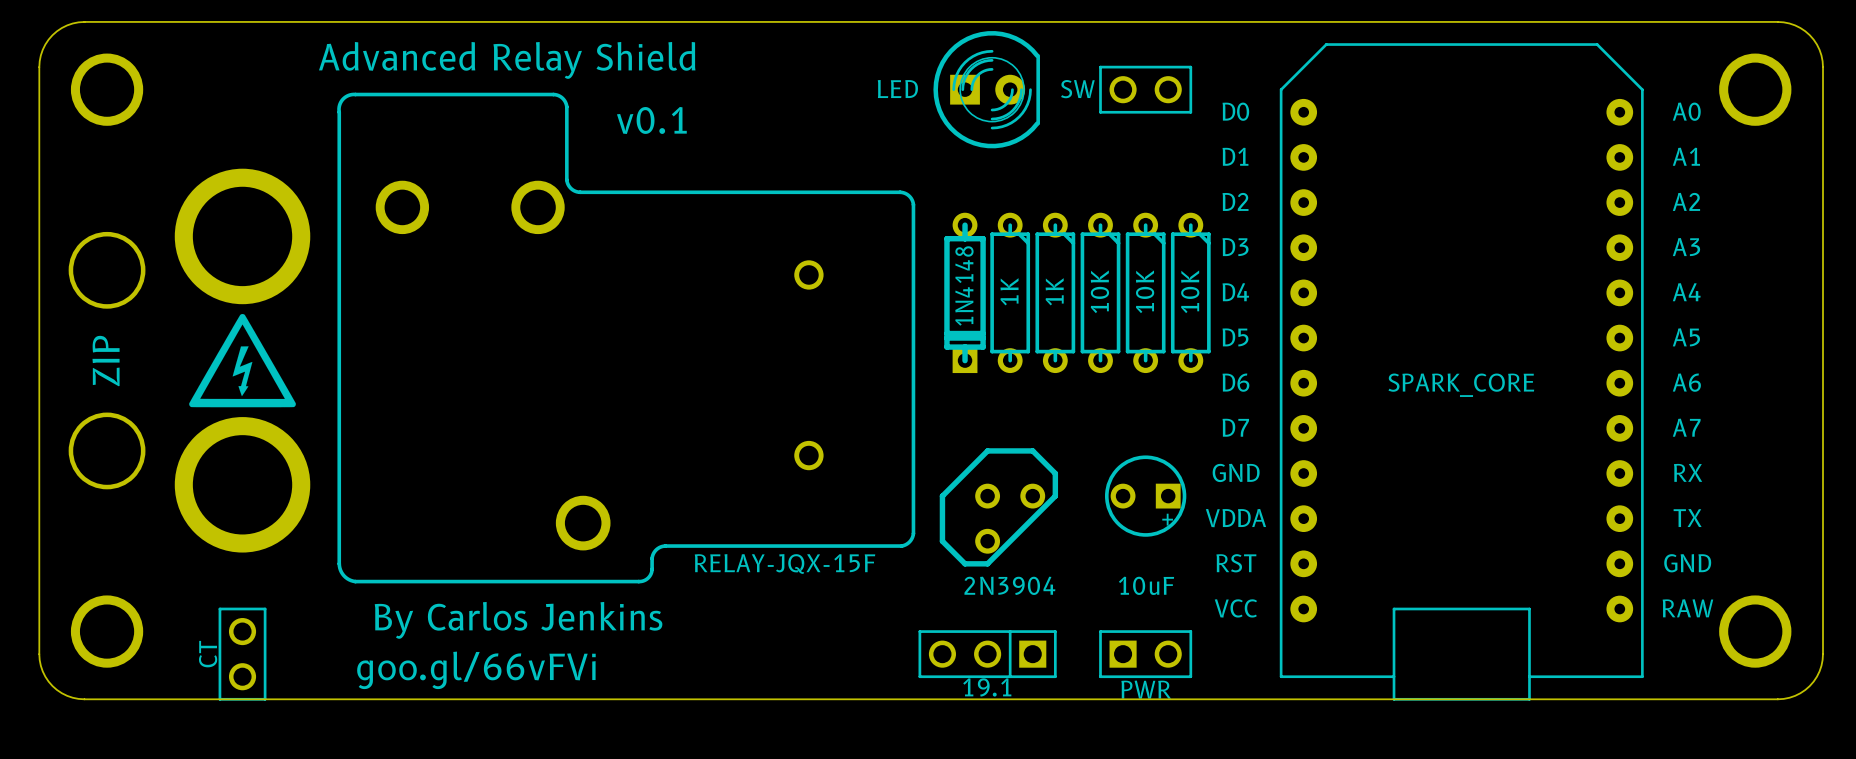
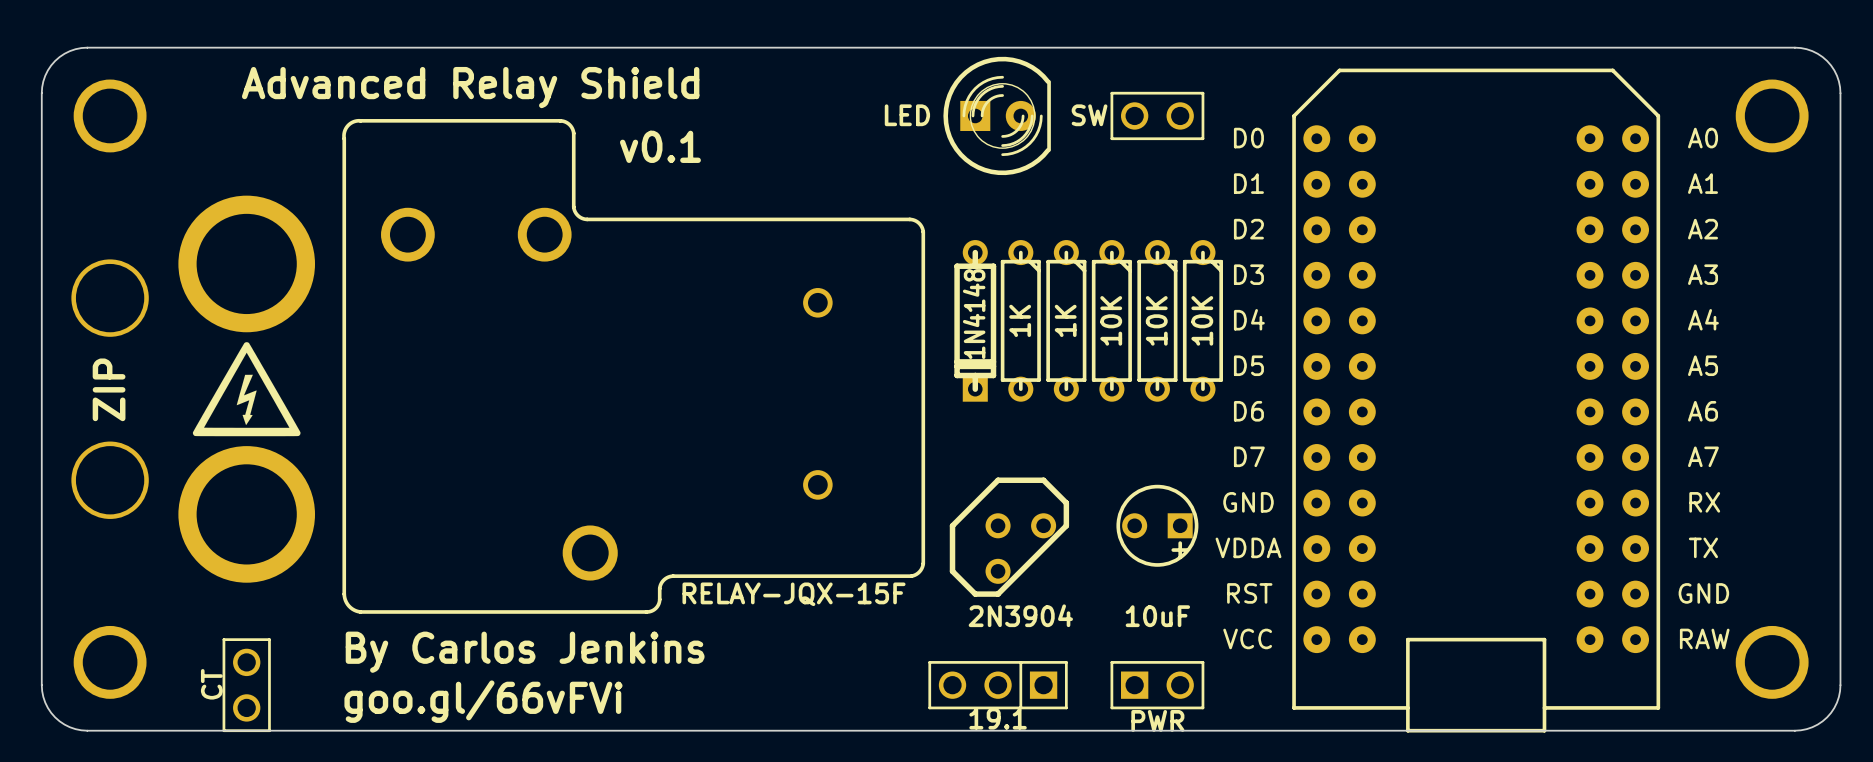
part footprint: [1279, 43, 1644, 701] -> [1292, 68, 1661, 733]
part value: SPARK_CORE (1461, 385) -> none

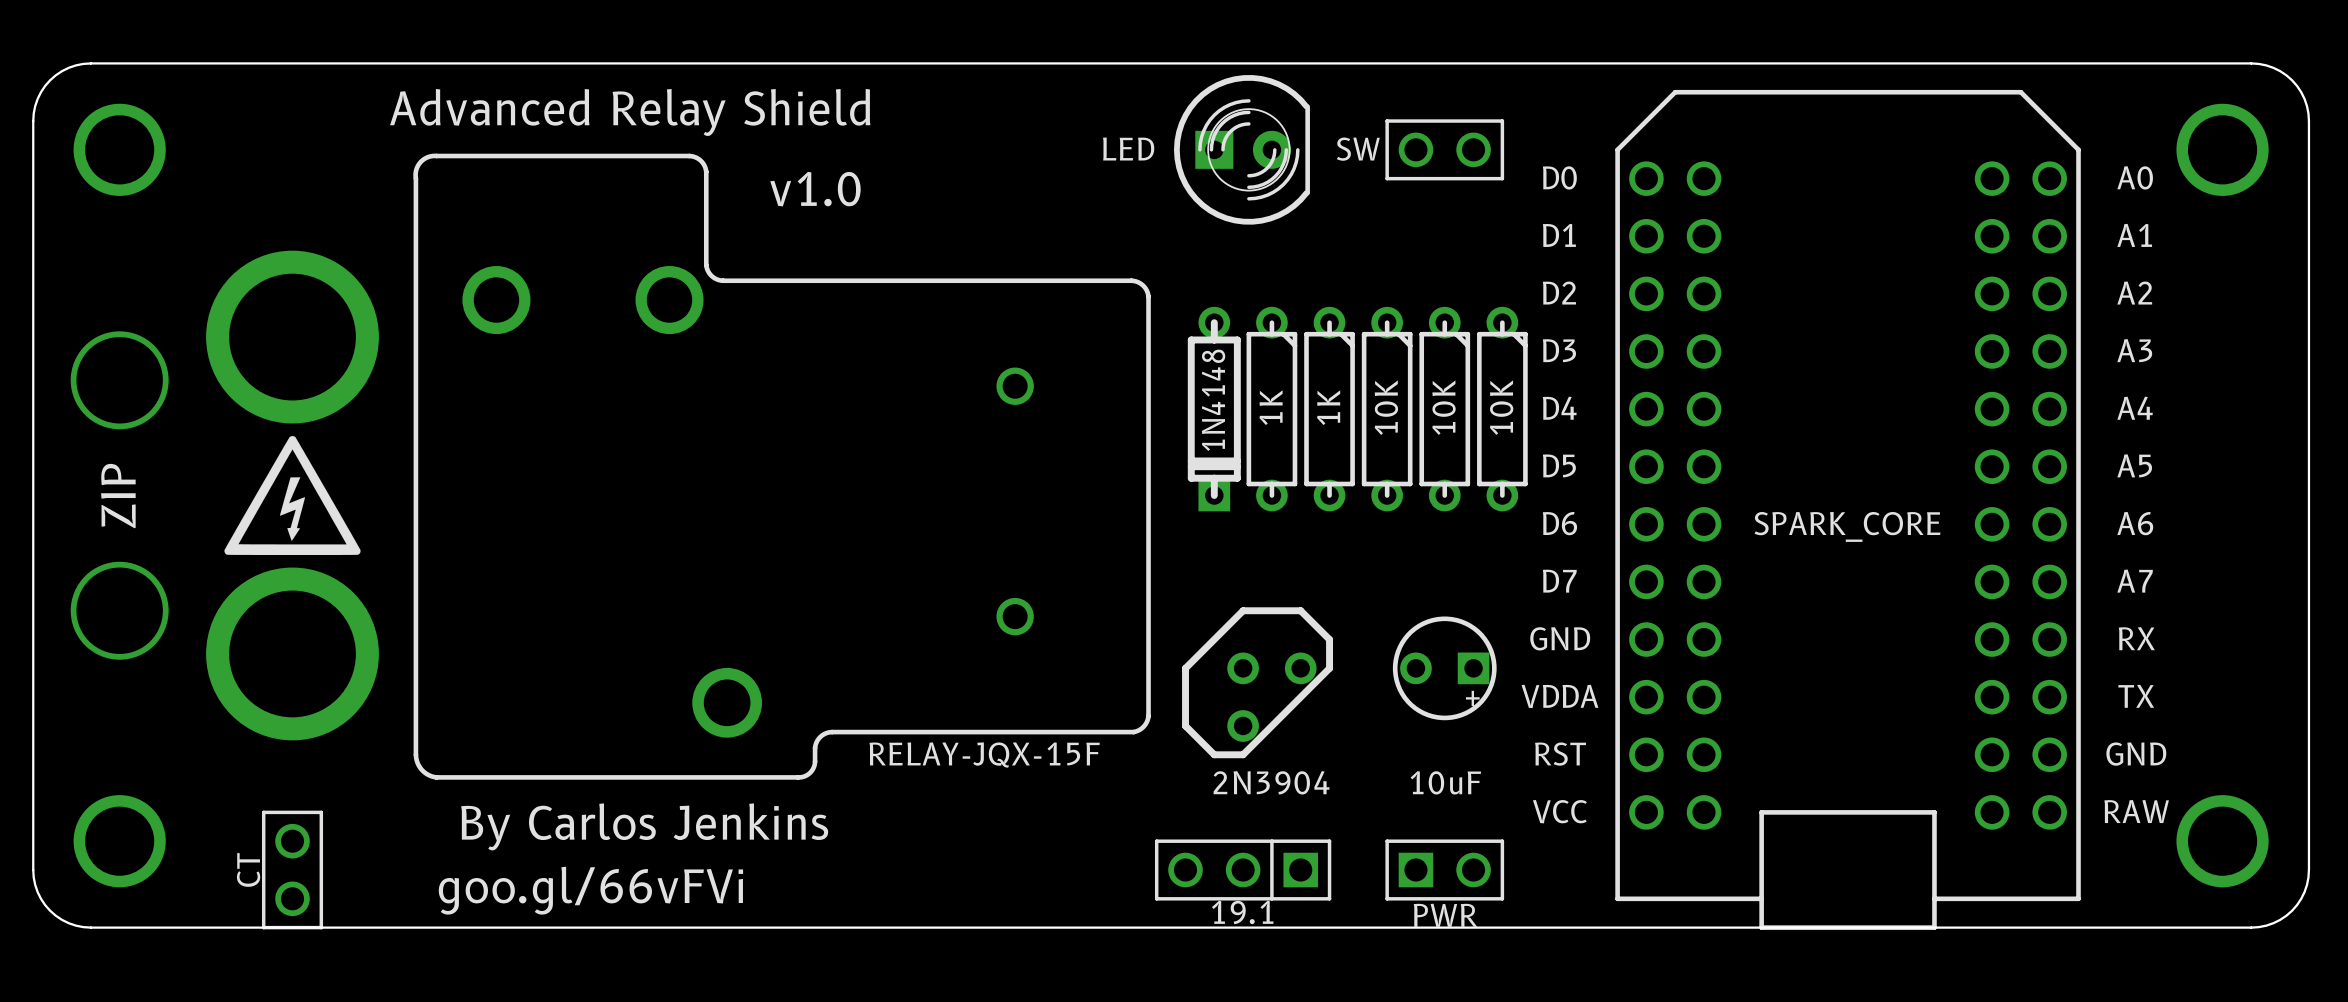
part footprint: [1292, 68, 1661, 733] -> [1615, 89, 2081, 930]
text: v0.1 (660, 146) -> v1.0 (815, 189)
part value: none -> SPARK_CORE (1847, 526)

